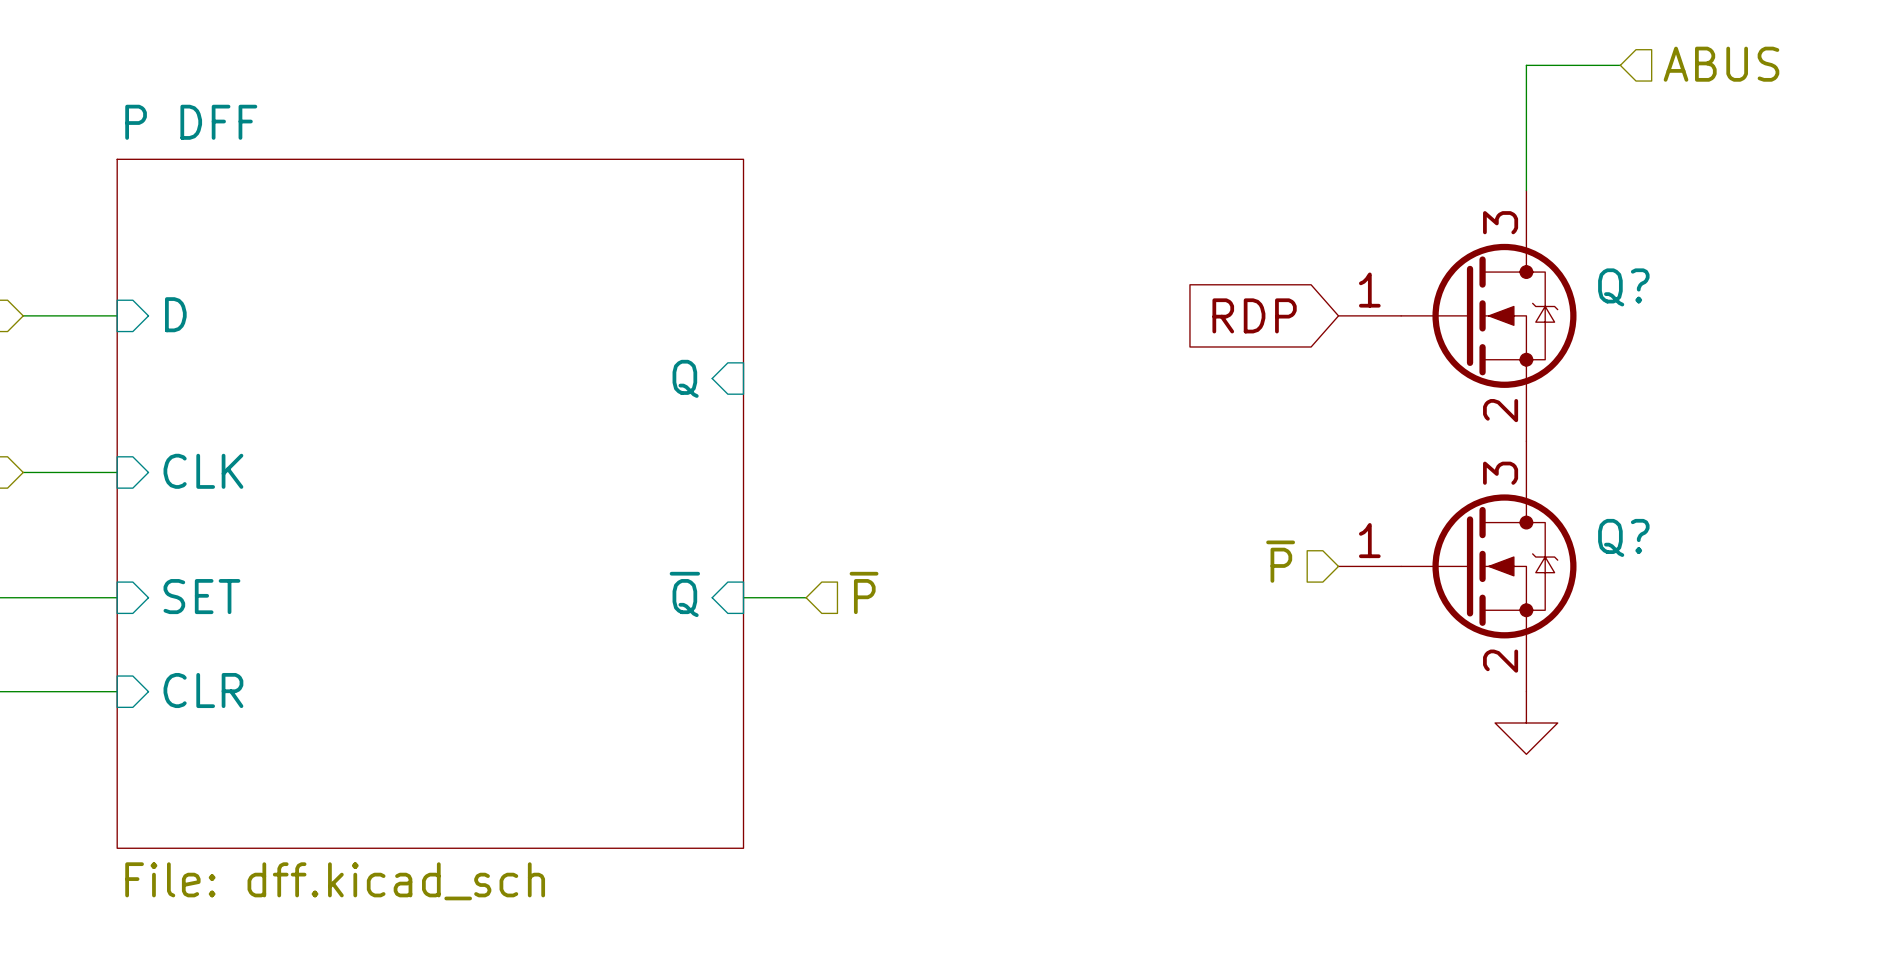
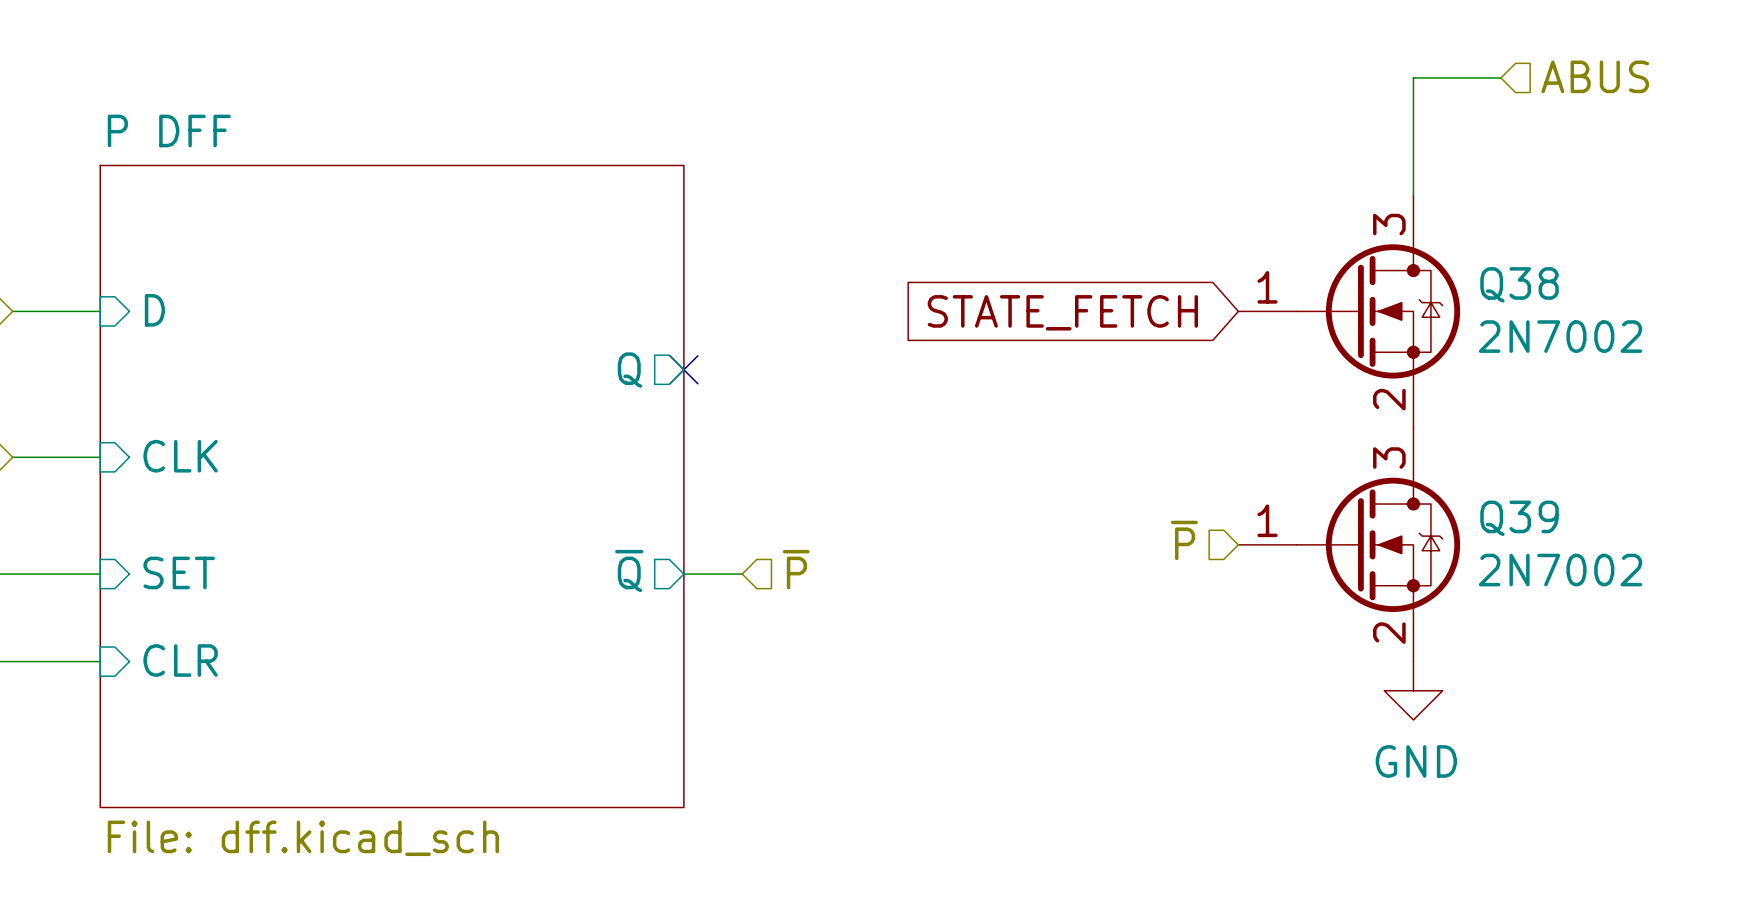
Q? name: Q? (1623, 287) -> Q38 (1519, 284)
global label: RDP (1254, 315) -> STATE_FETCH (1062, 312)
Q? value: none -> 2N7002 (1560, 336)
sheet pin shape: input (685, 378) -> output (629, 370)
no-connect mark: none -> (683, 369)
Q? name: Q? (1623, 537) -> Q39 (1519, 518)
Q? value: none -> 2N7002 (1560, 570)
sheet pin shape: input (684, 594) -> output (629, 570)
power symbol text: none -> GND (1416, 761)

